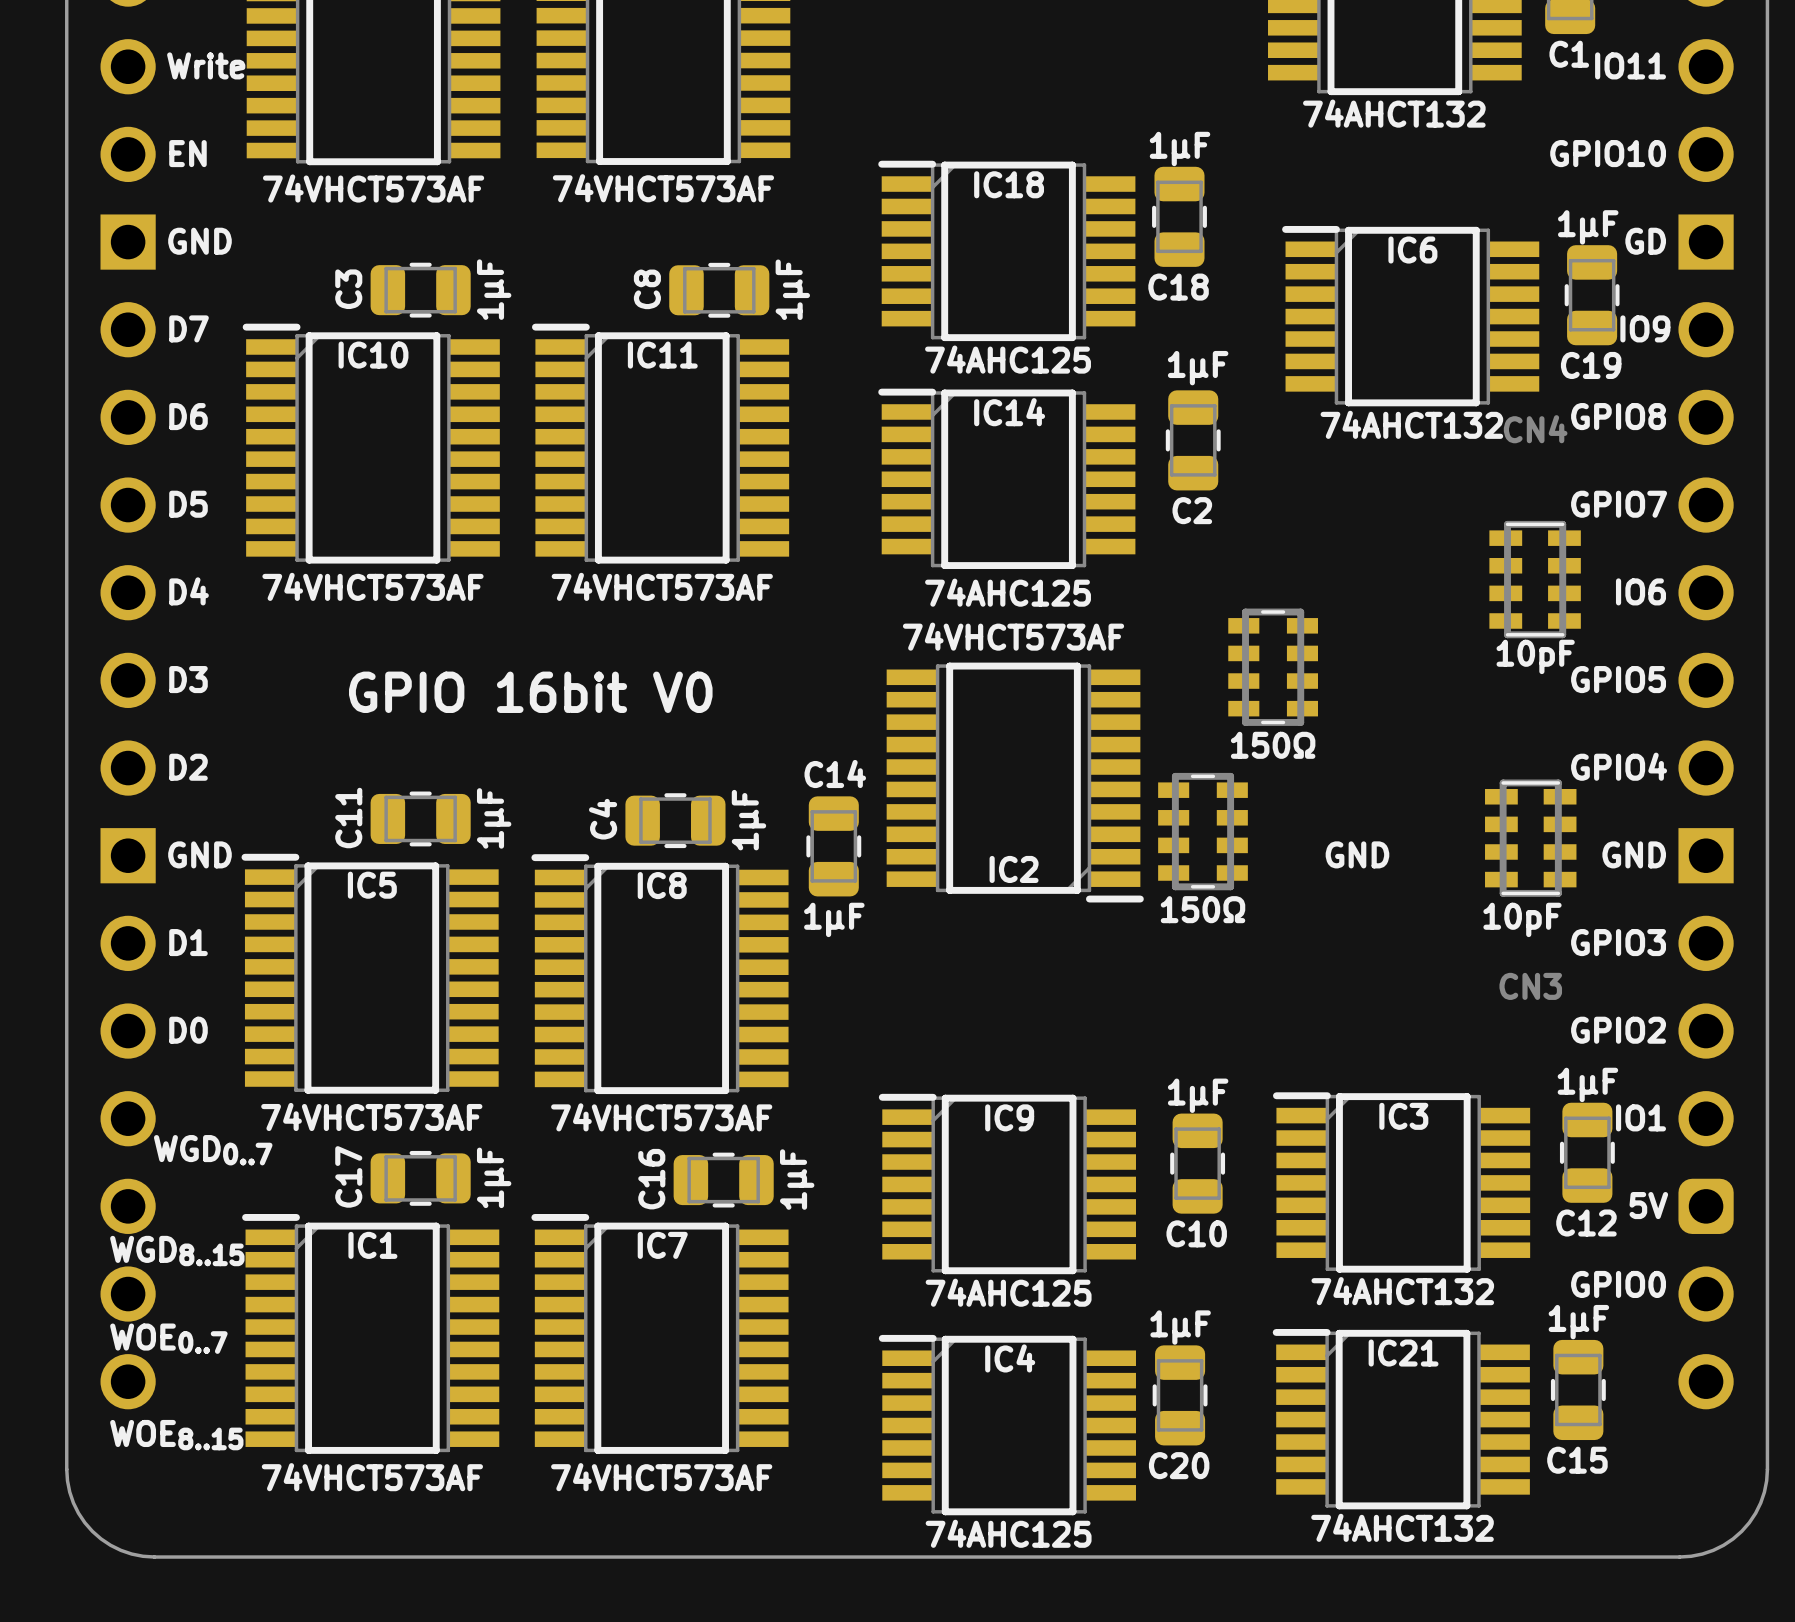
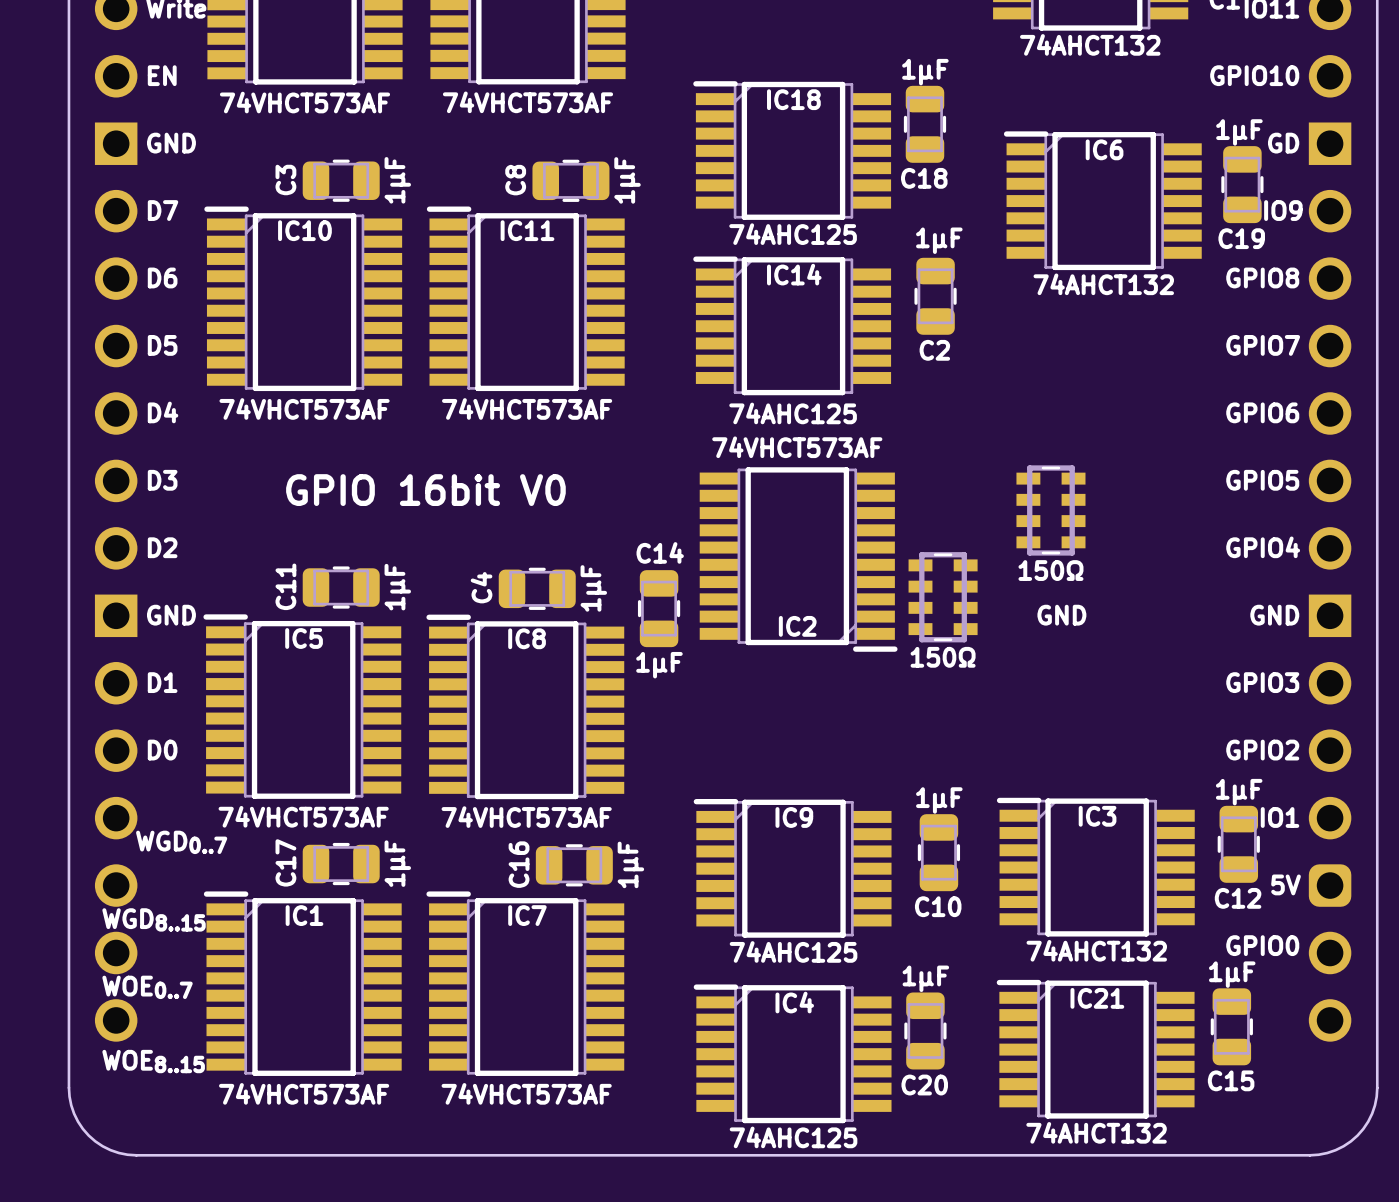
CN4: (1535, 579) -> none
text: IO6 (1640, 591) -> GPIO6 (1262, 412)
part position: (1273, 667) -> (1050, 510)
CN3: (1530, 838) -> none

